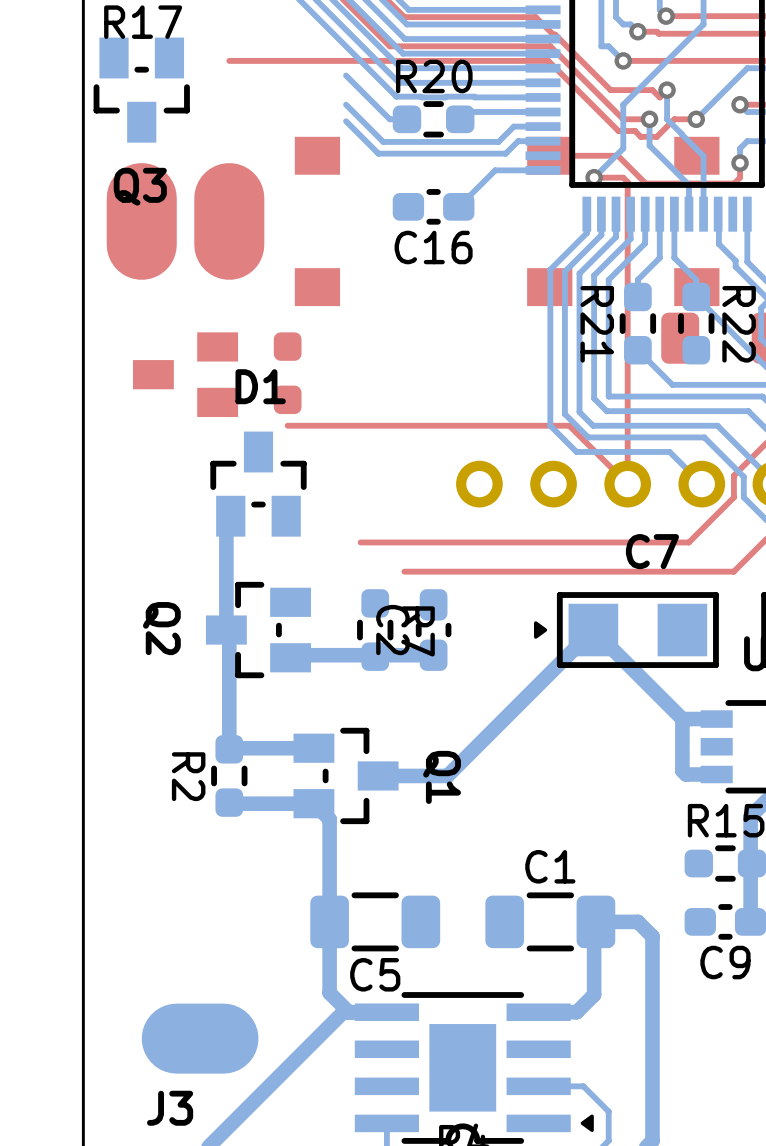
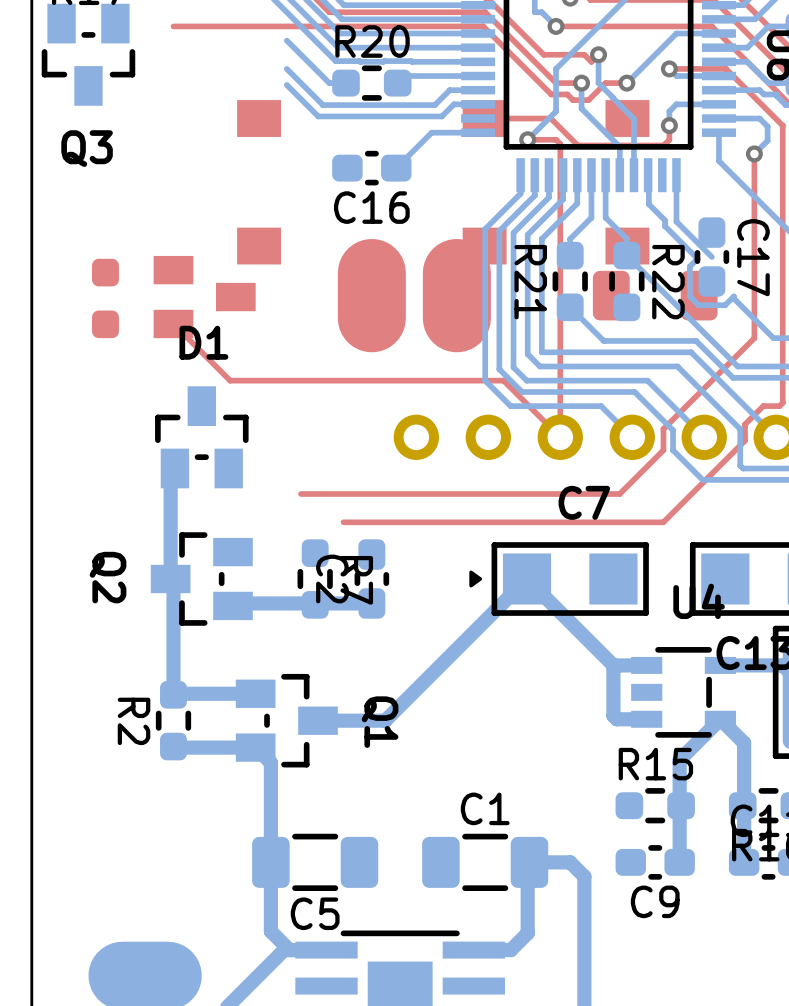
part: (141, 221) -> none
part: (229, 221) -> none
part: none -> (371, 295)
part: none -> (456, 295)
top track: none -> (173, 323) (230, 380)
part position: (287, 373) -> (105, 298)
part rotation: 0° (185, 374) -> 180° (204, 297)
part position: (185, 374) -> (204, 297)

